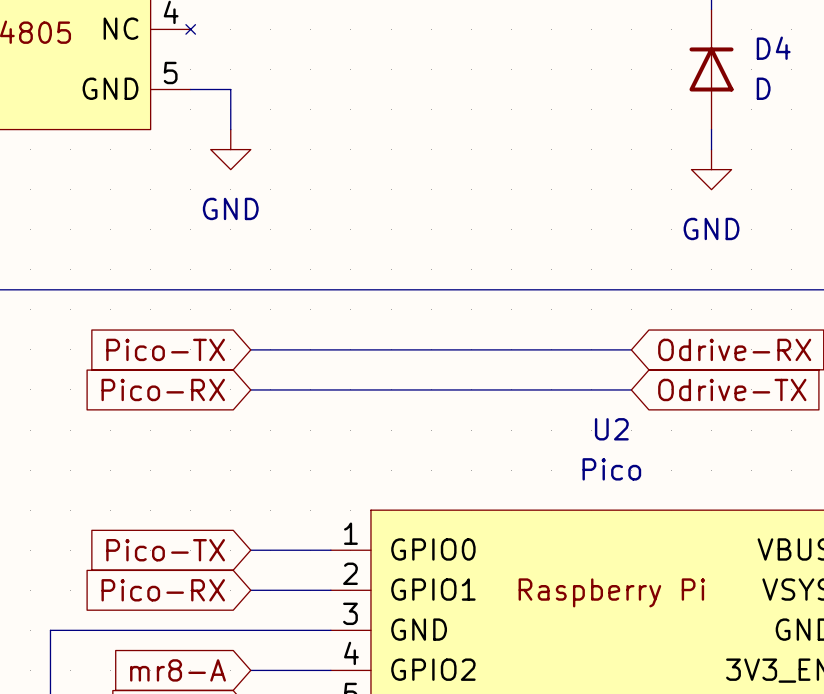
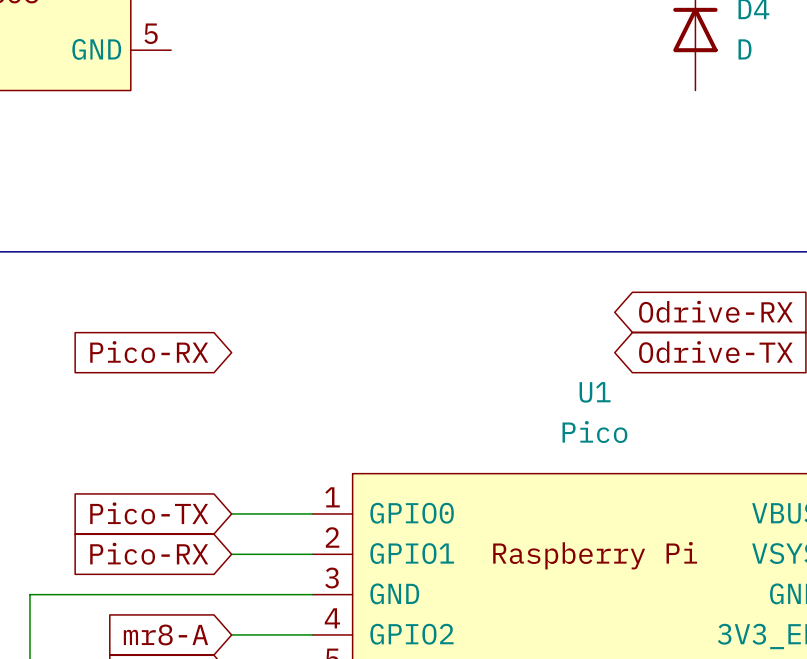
wire: (190, 89) (230, 89) (230, 129) -> none
wire: (711, 129) (711, 149) -> none
power symbol: GND (230, 149) -> none
power symbol: GND (711, 169) -> none
global label: Pico-TX (165, 349) -> none
wire: (250, 349) (631, 349) -> none
wire: (250, 389) (631, 389) -> none
U2 name: U2 (611, 429) -> U1 (595, 392)

